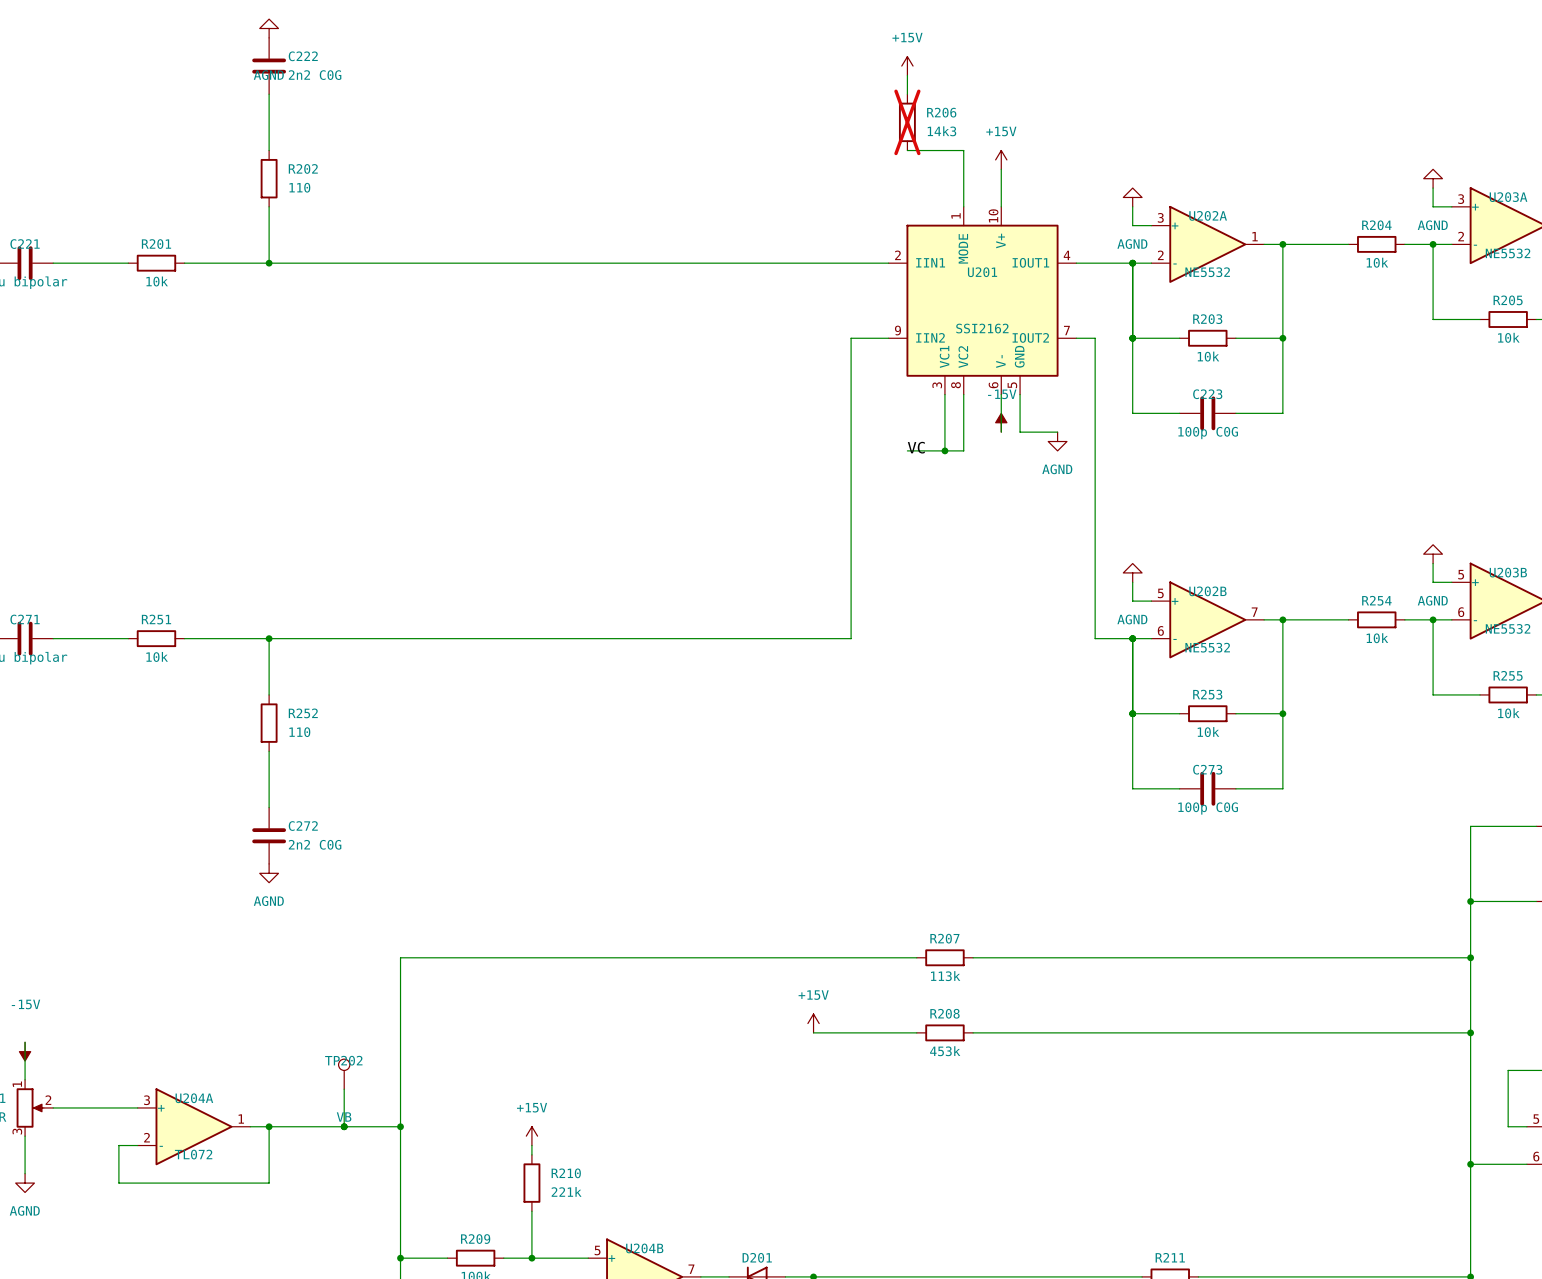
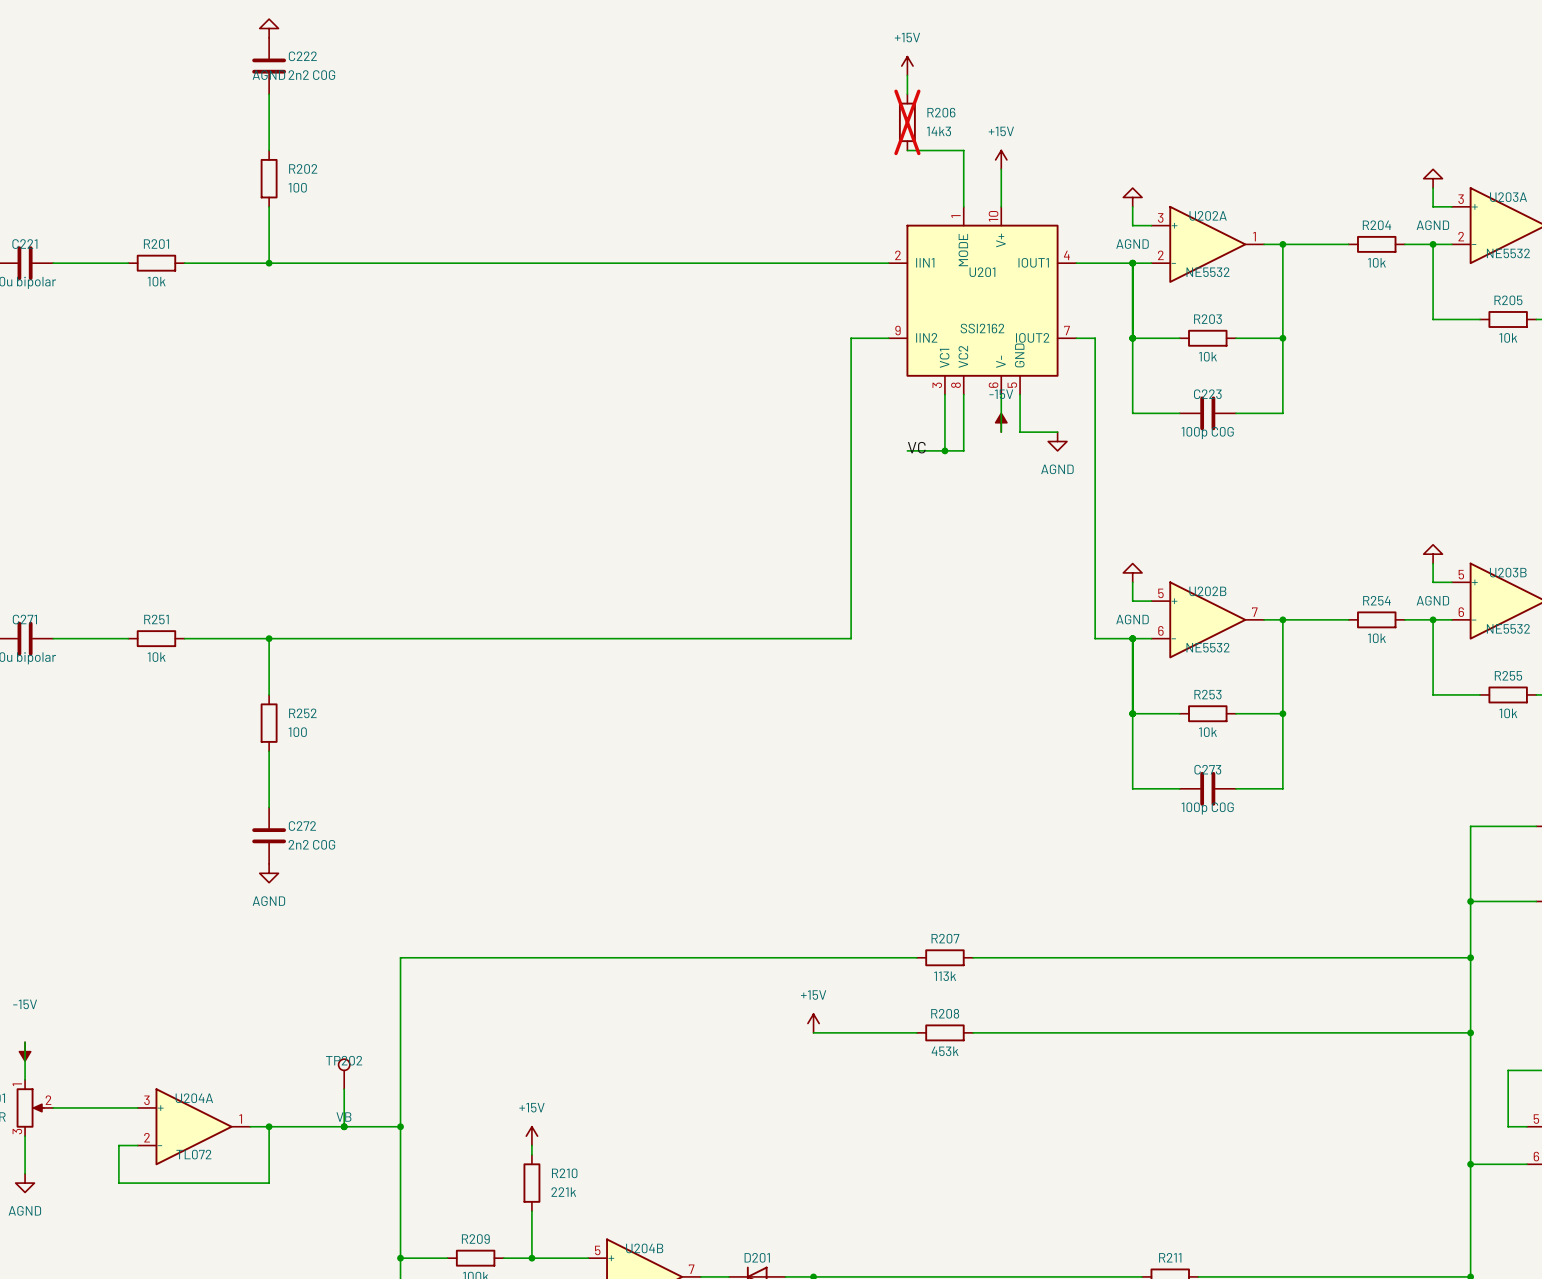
R202 value: 110 (299, 187) -> 100 (297, 187)
R252 value: 110 (299, 732) -> 100 (297, 732)

